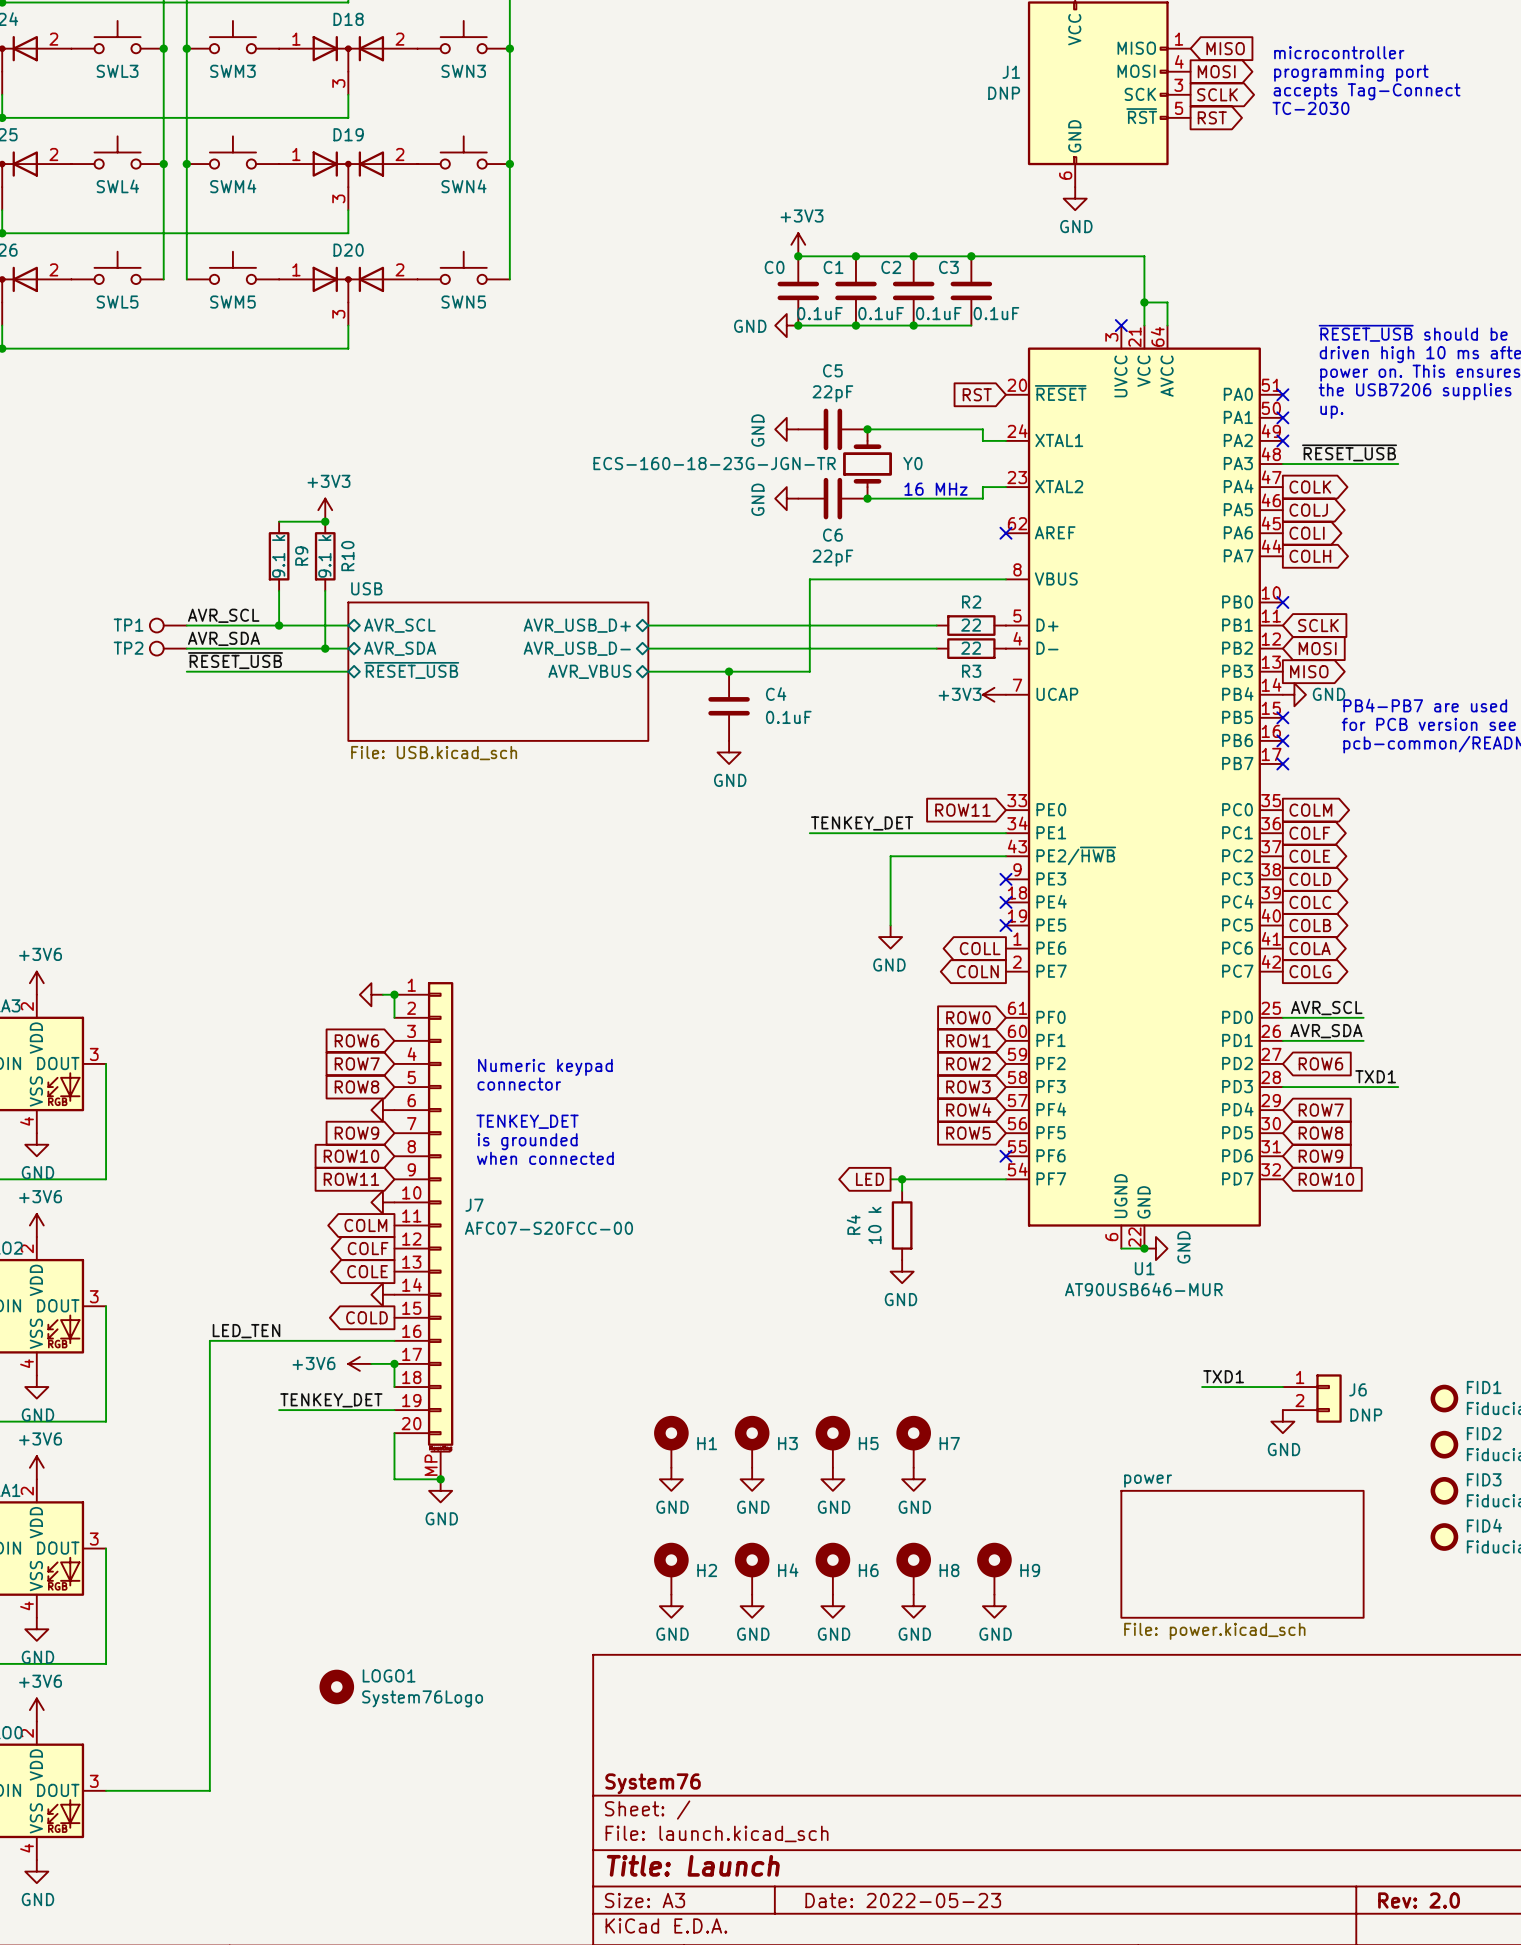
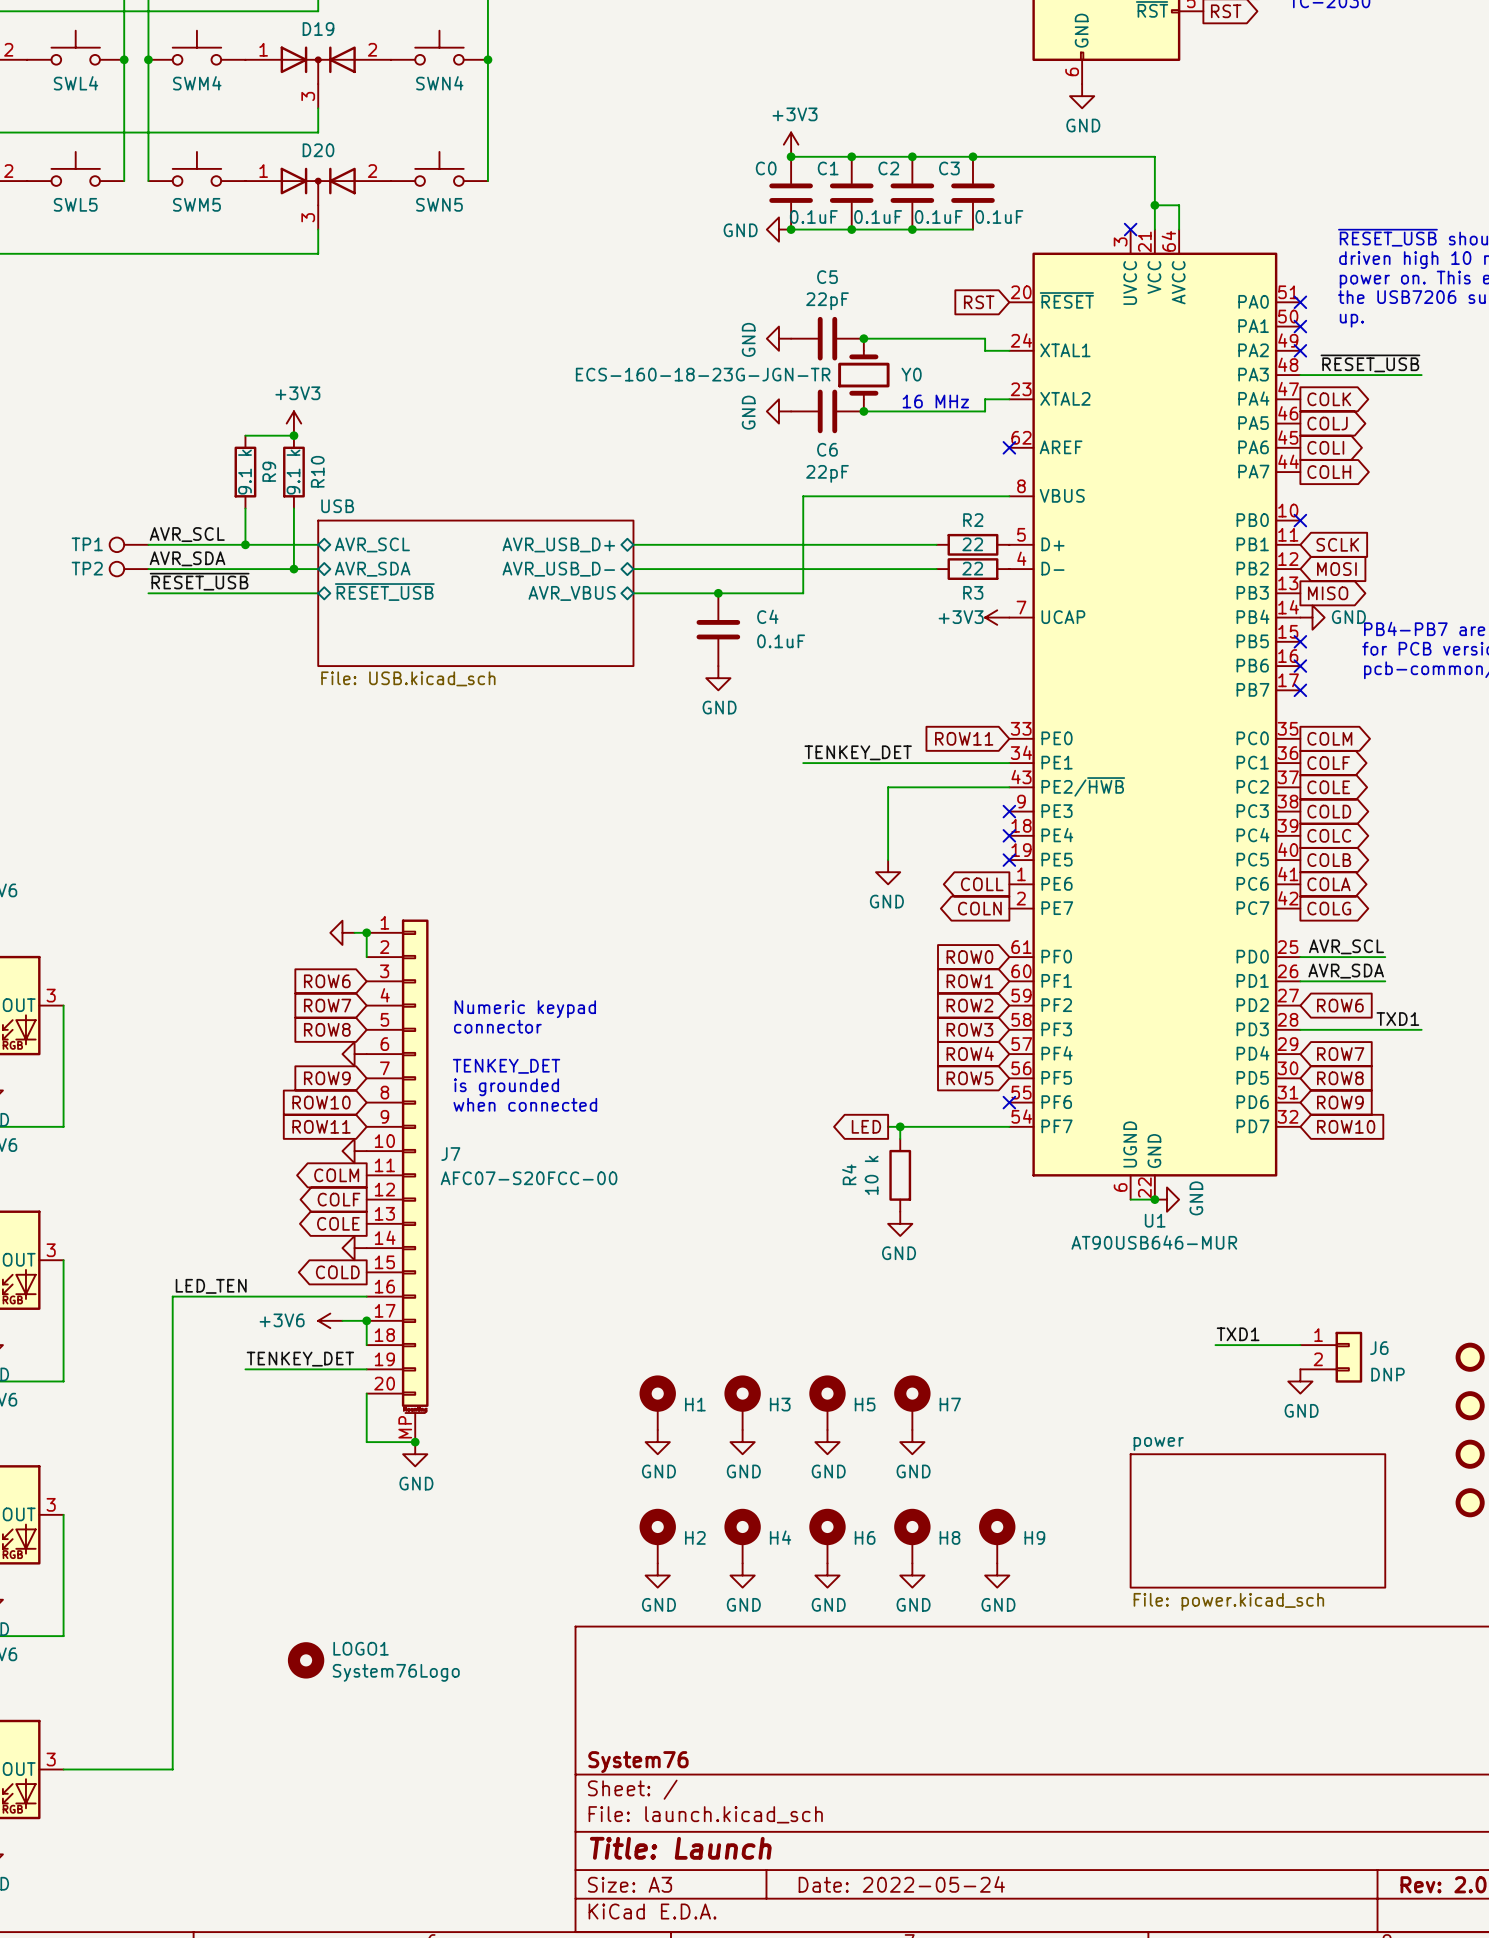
title block: Date: 2022-05-23 (903, 1900) -> Date: 2022-05-24 (901, 1884)

